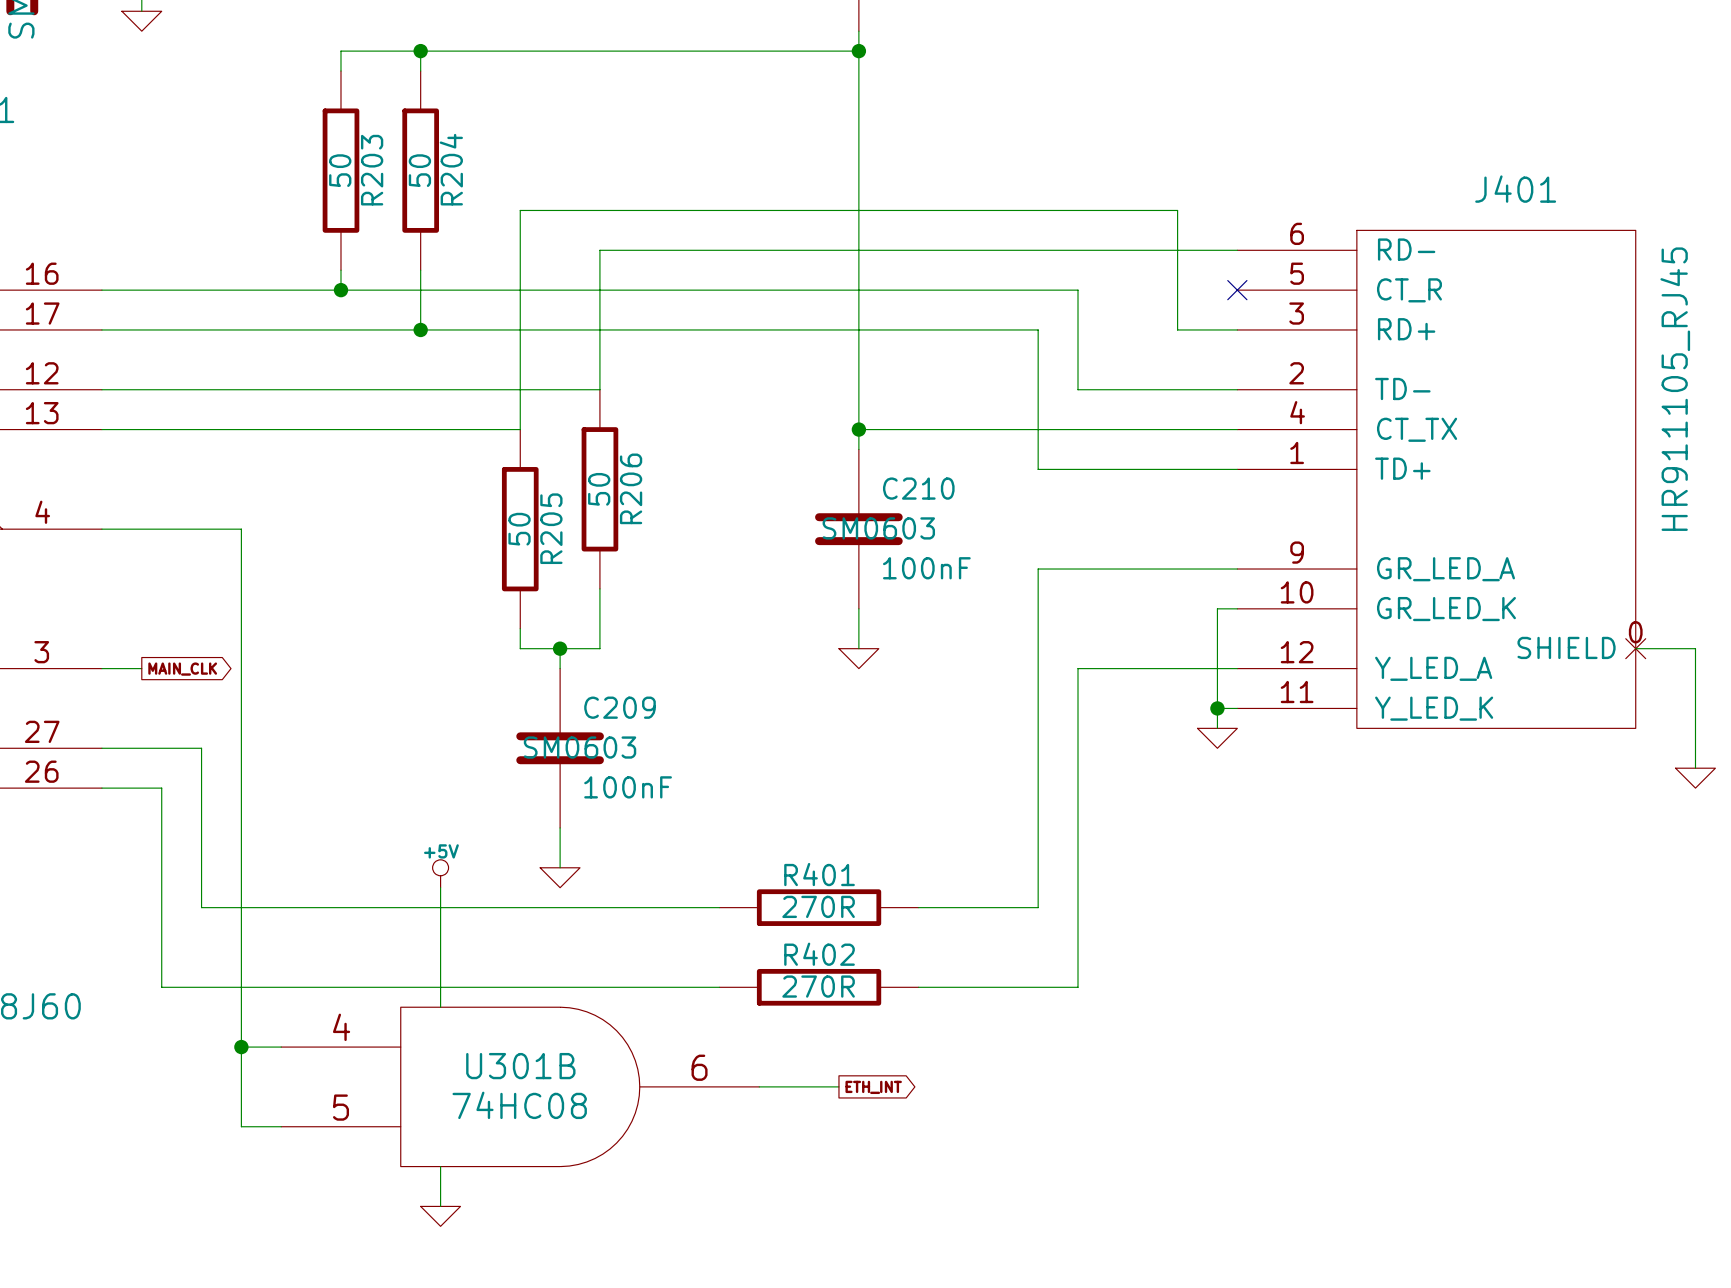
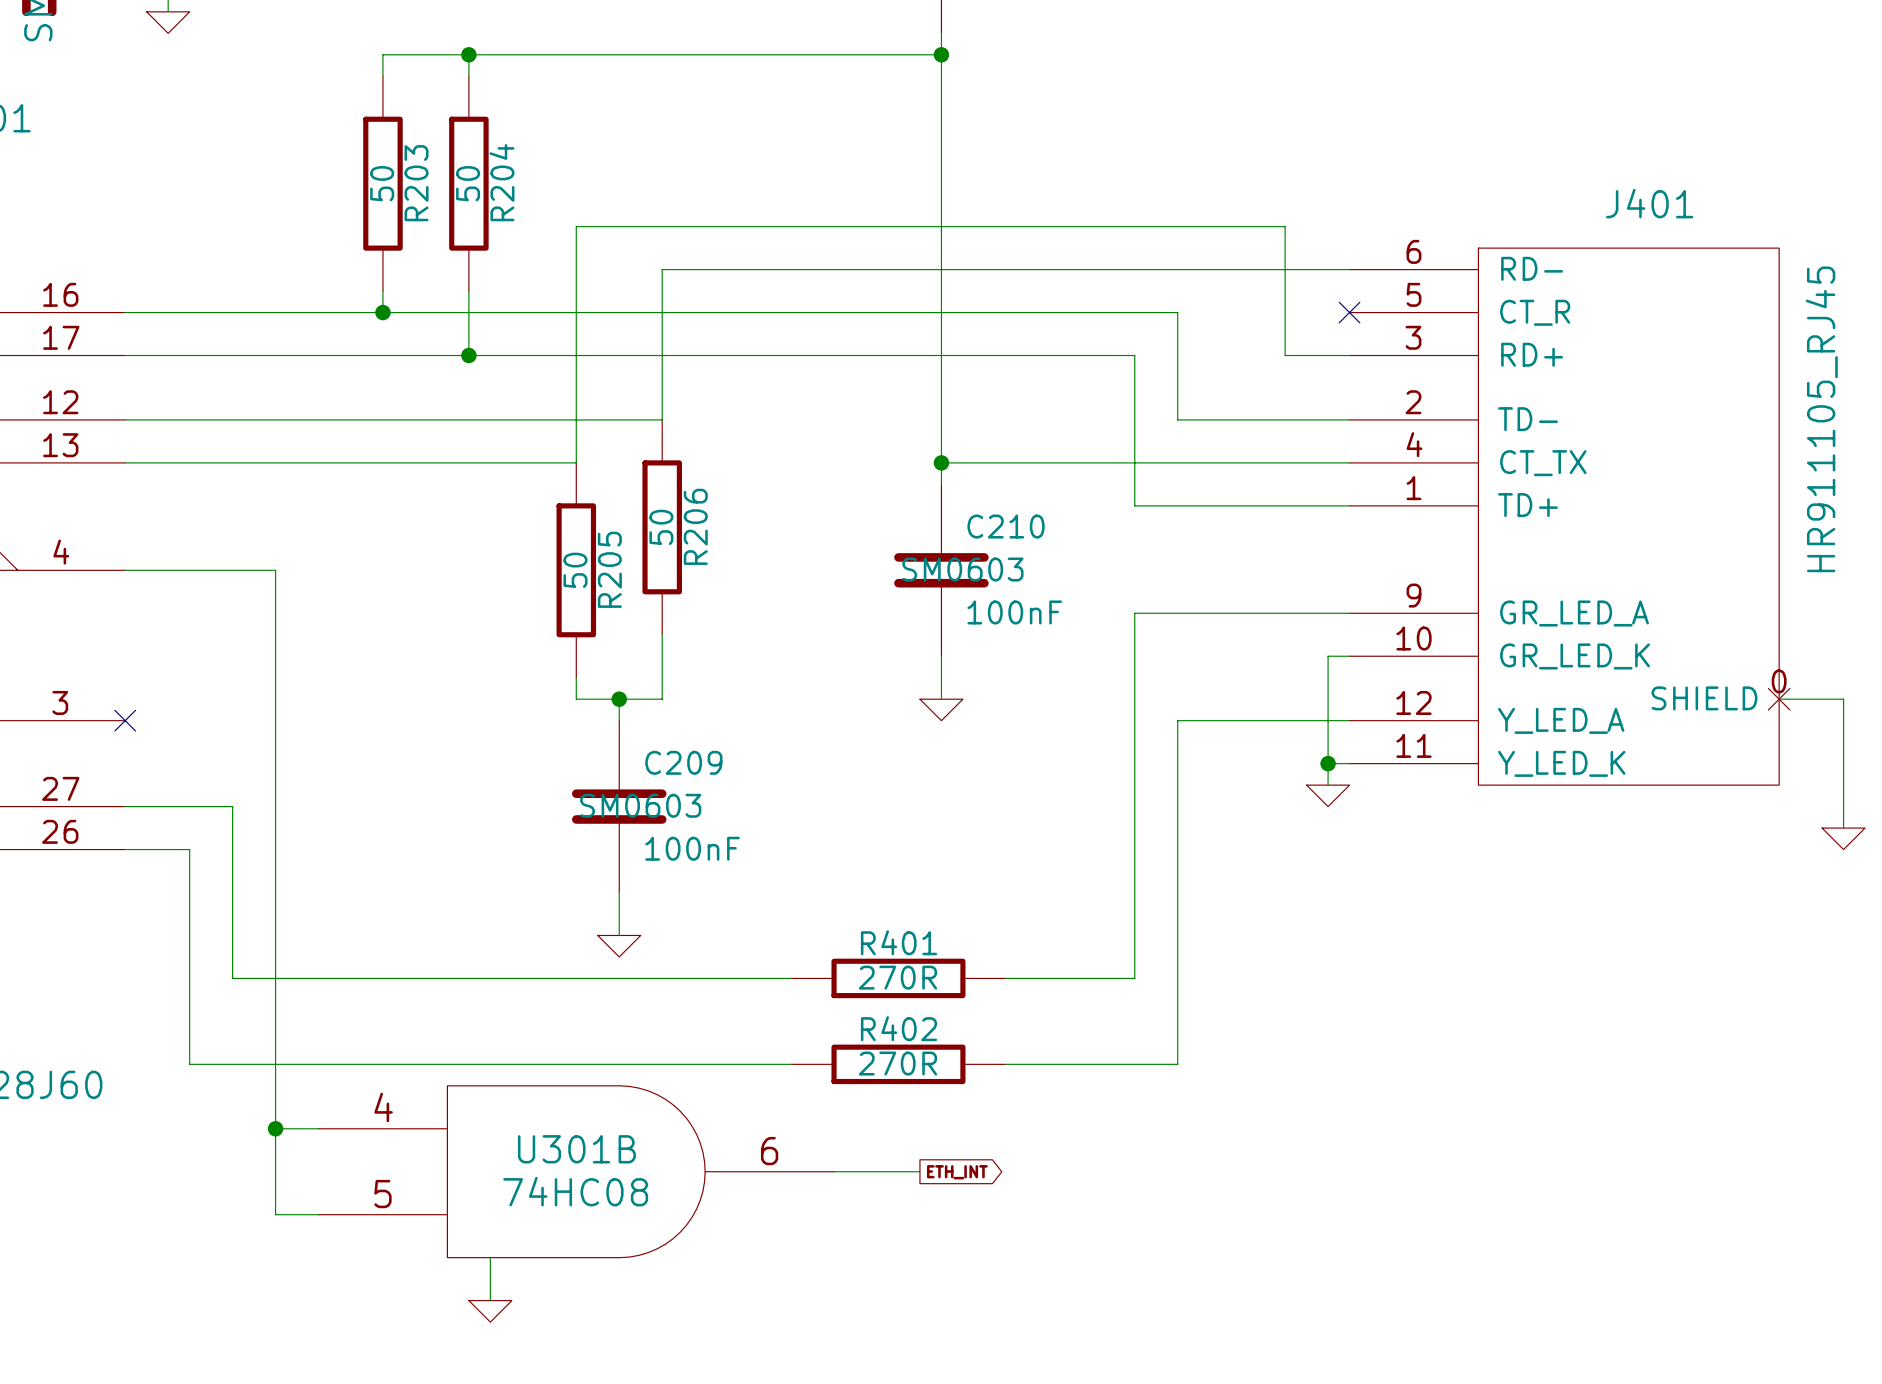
wire: (101, 668) (141, 668) -> none
no-connect mark: none -> (125, 720)
global label: MAIN_CLK (182, 669) -> none
power symbol: +5V (440, 873) -> none
wire: (440, 887) (440, 1007) -> none

